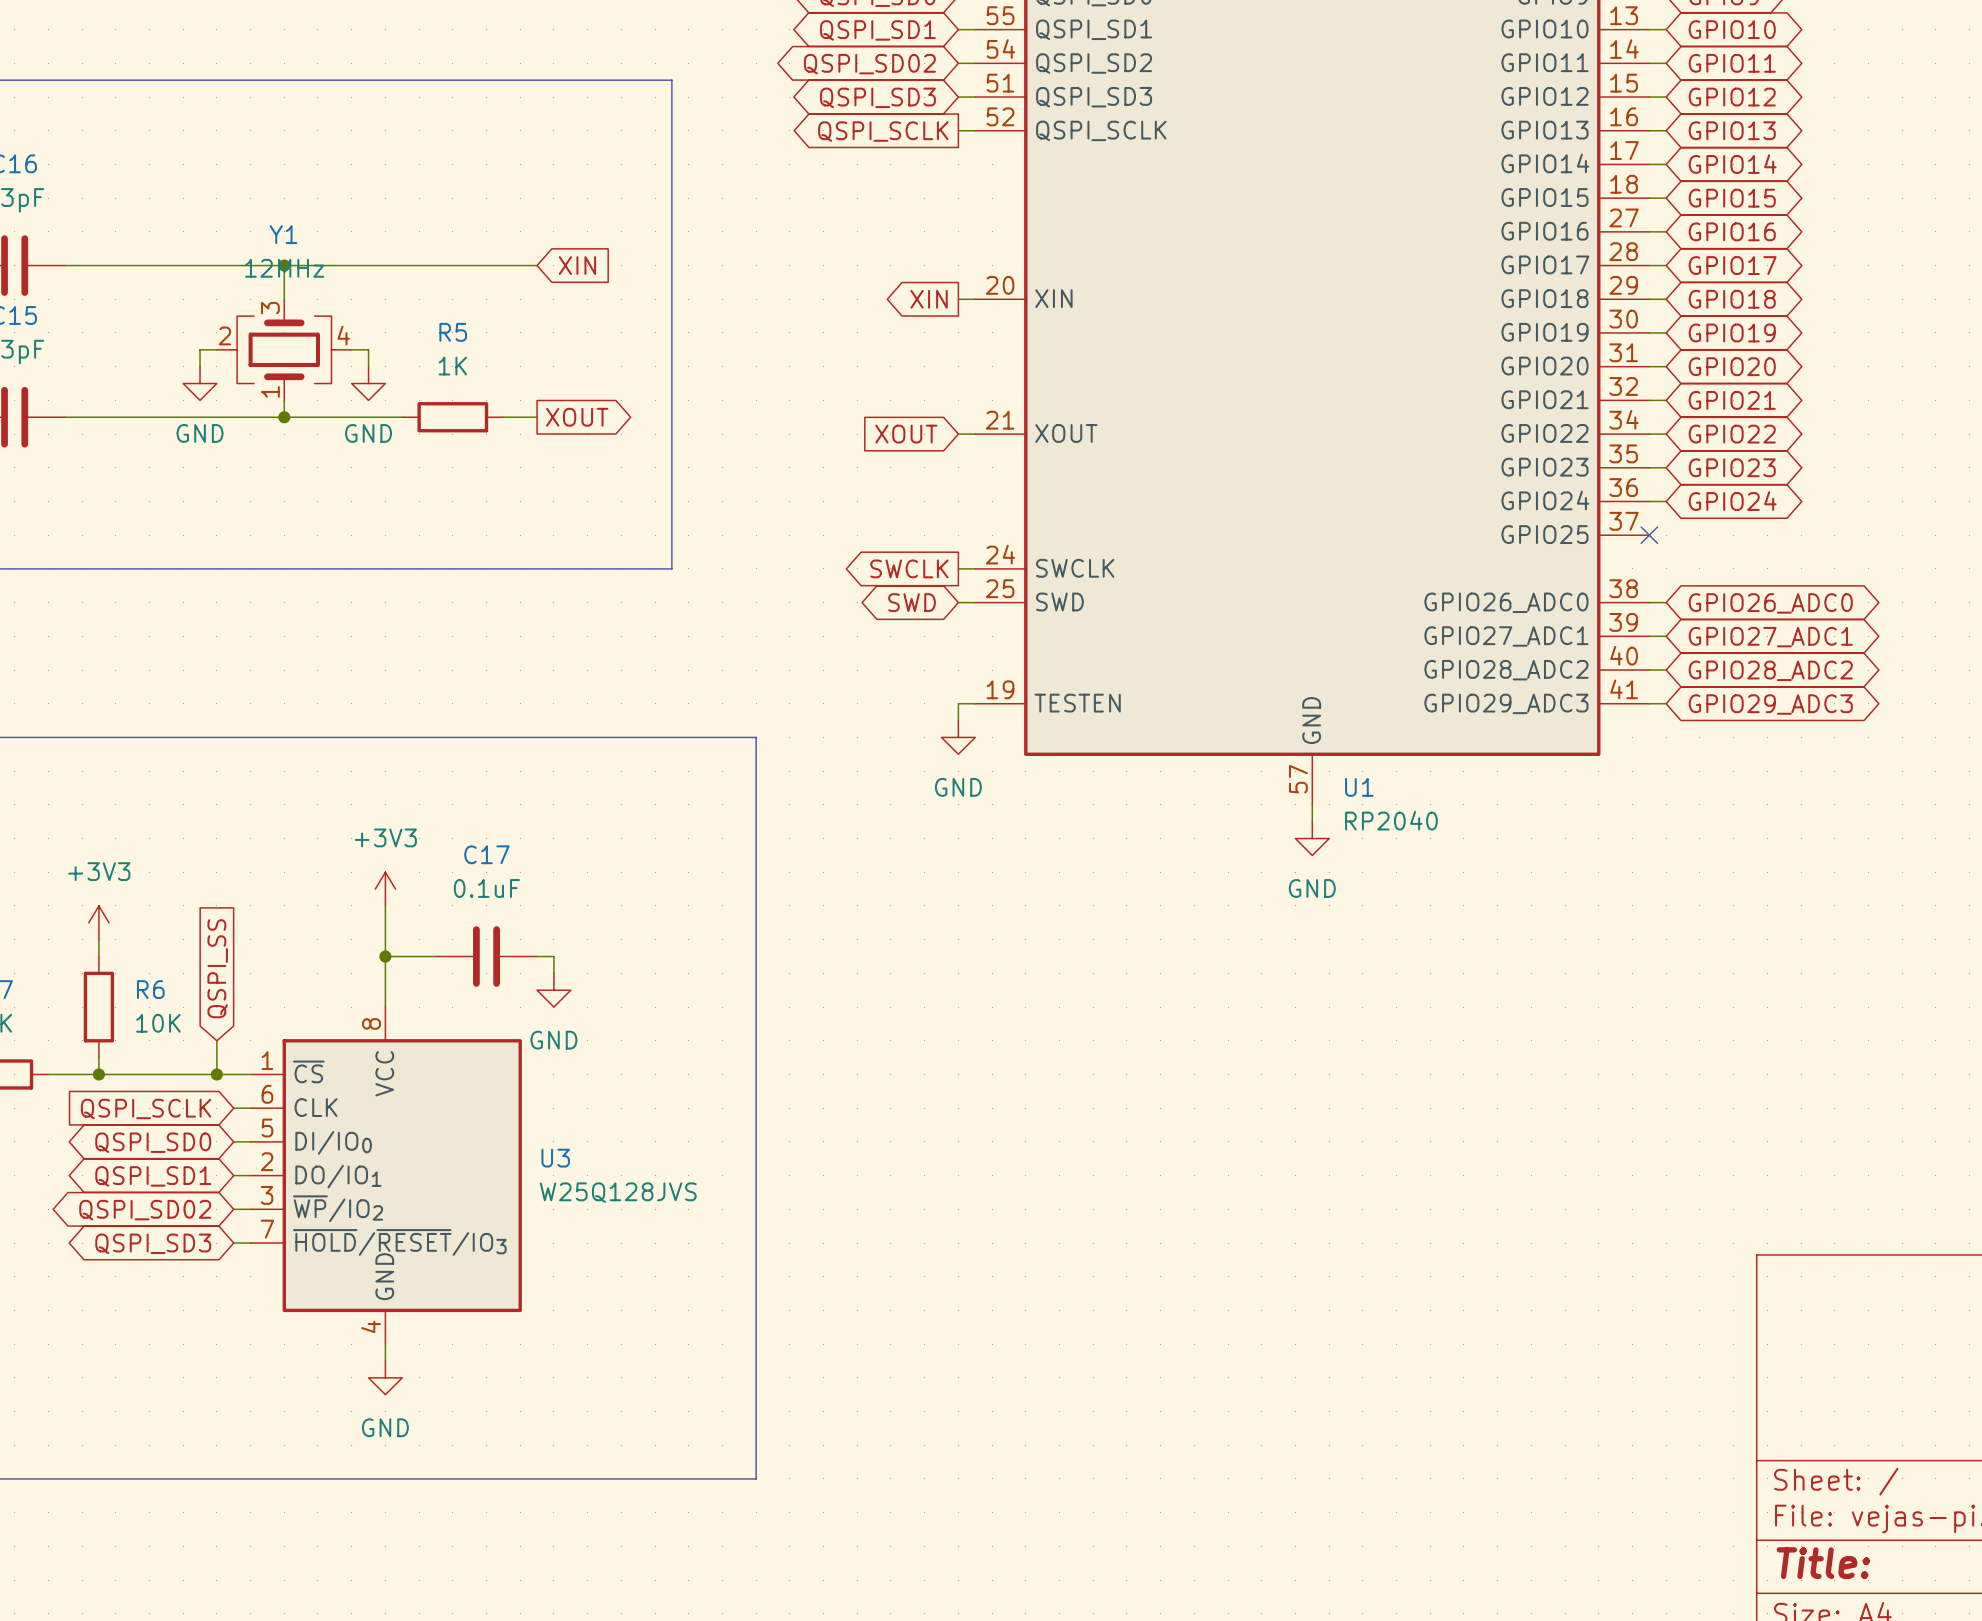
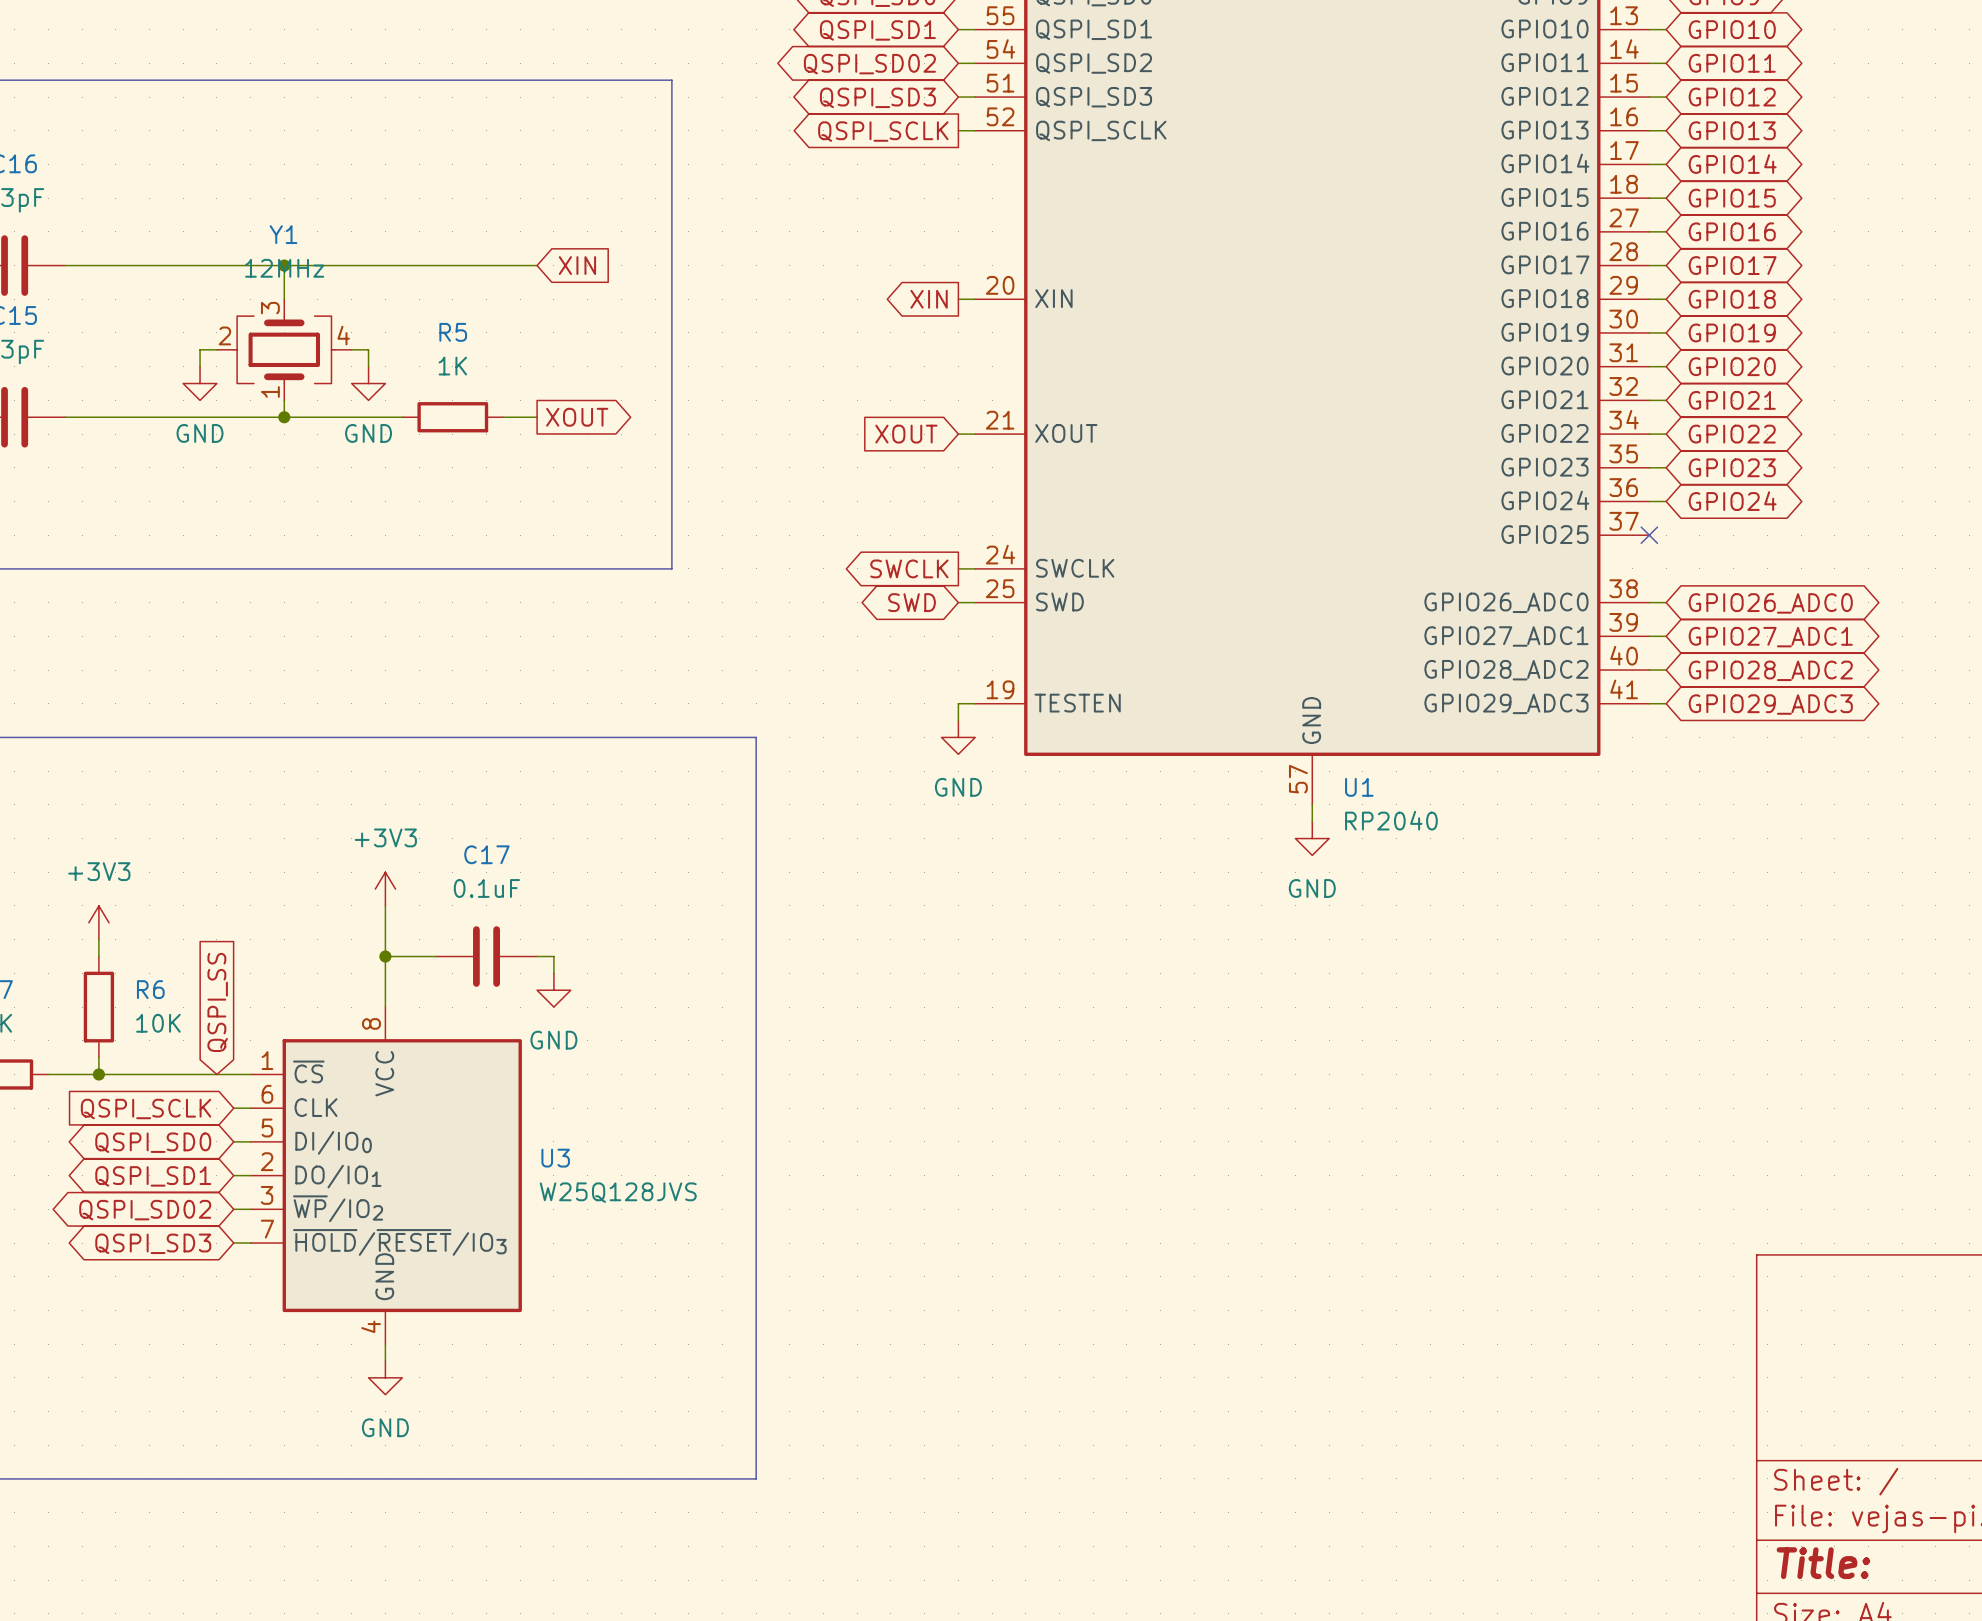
global label position: QSPI_SS (217, 968) -> QSPI_SS (217, 1002)
wire: (216, 1040) (216, 1074) -> none
junction: (216, 1074) -> none

